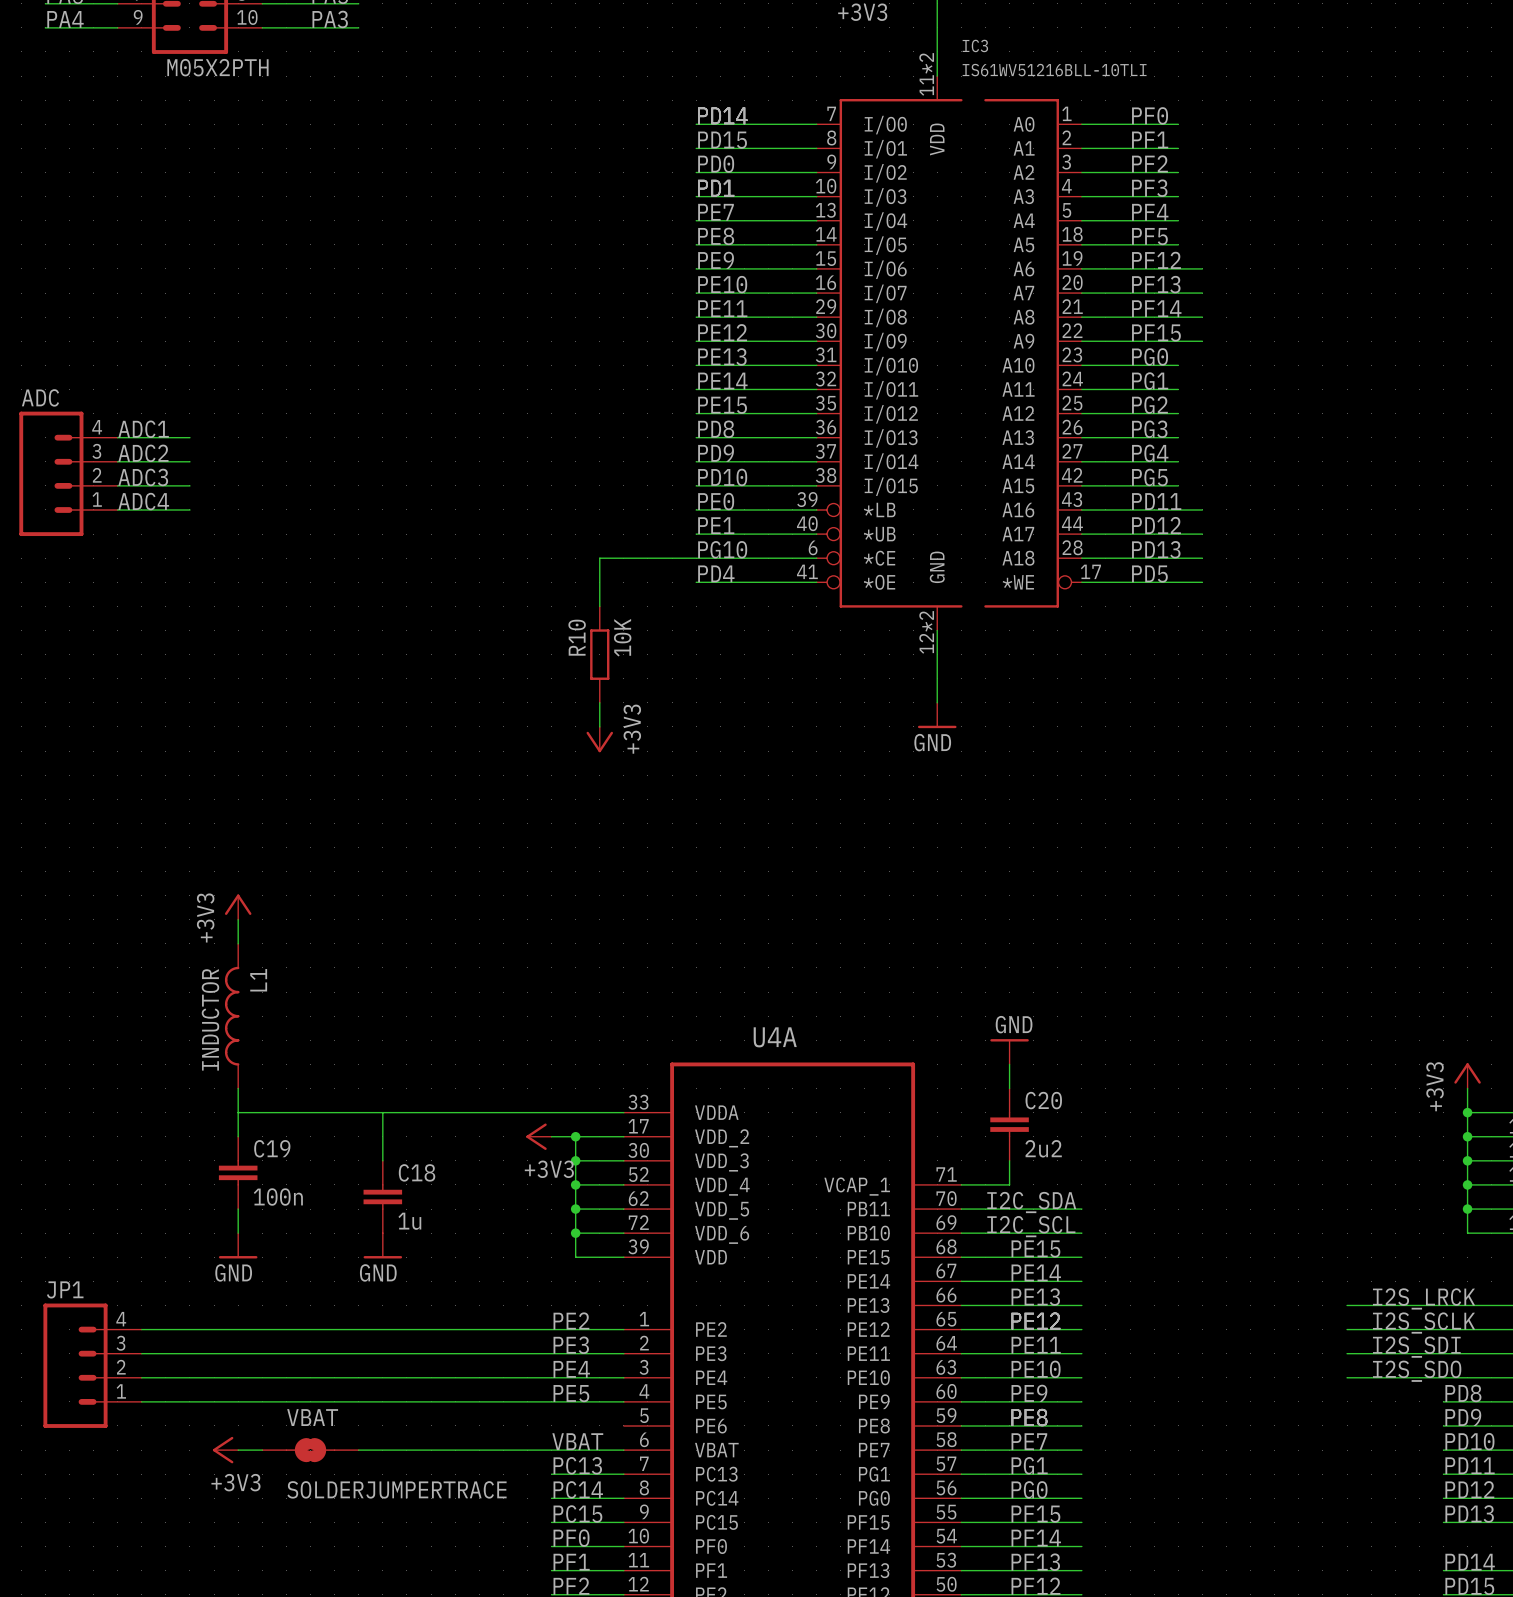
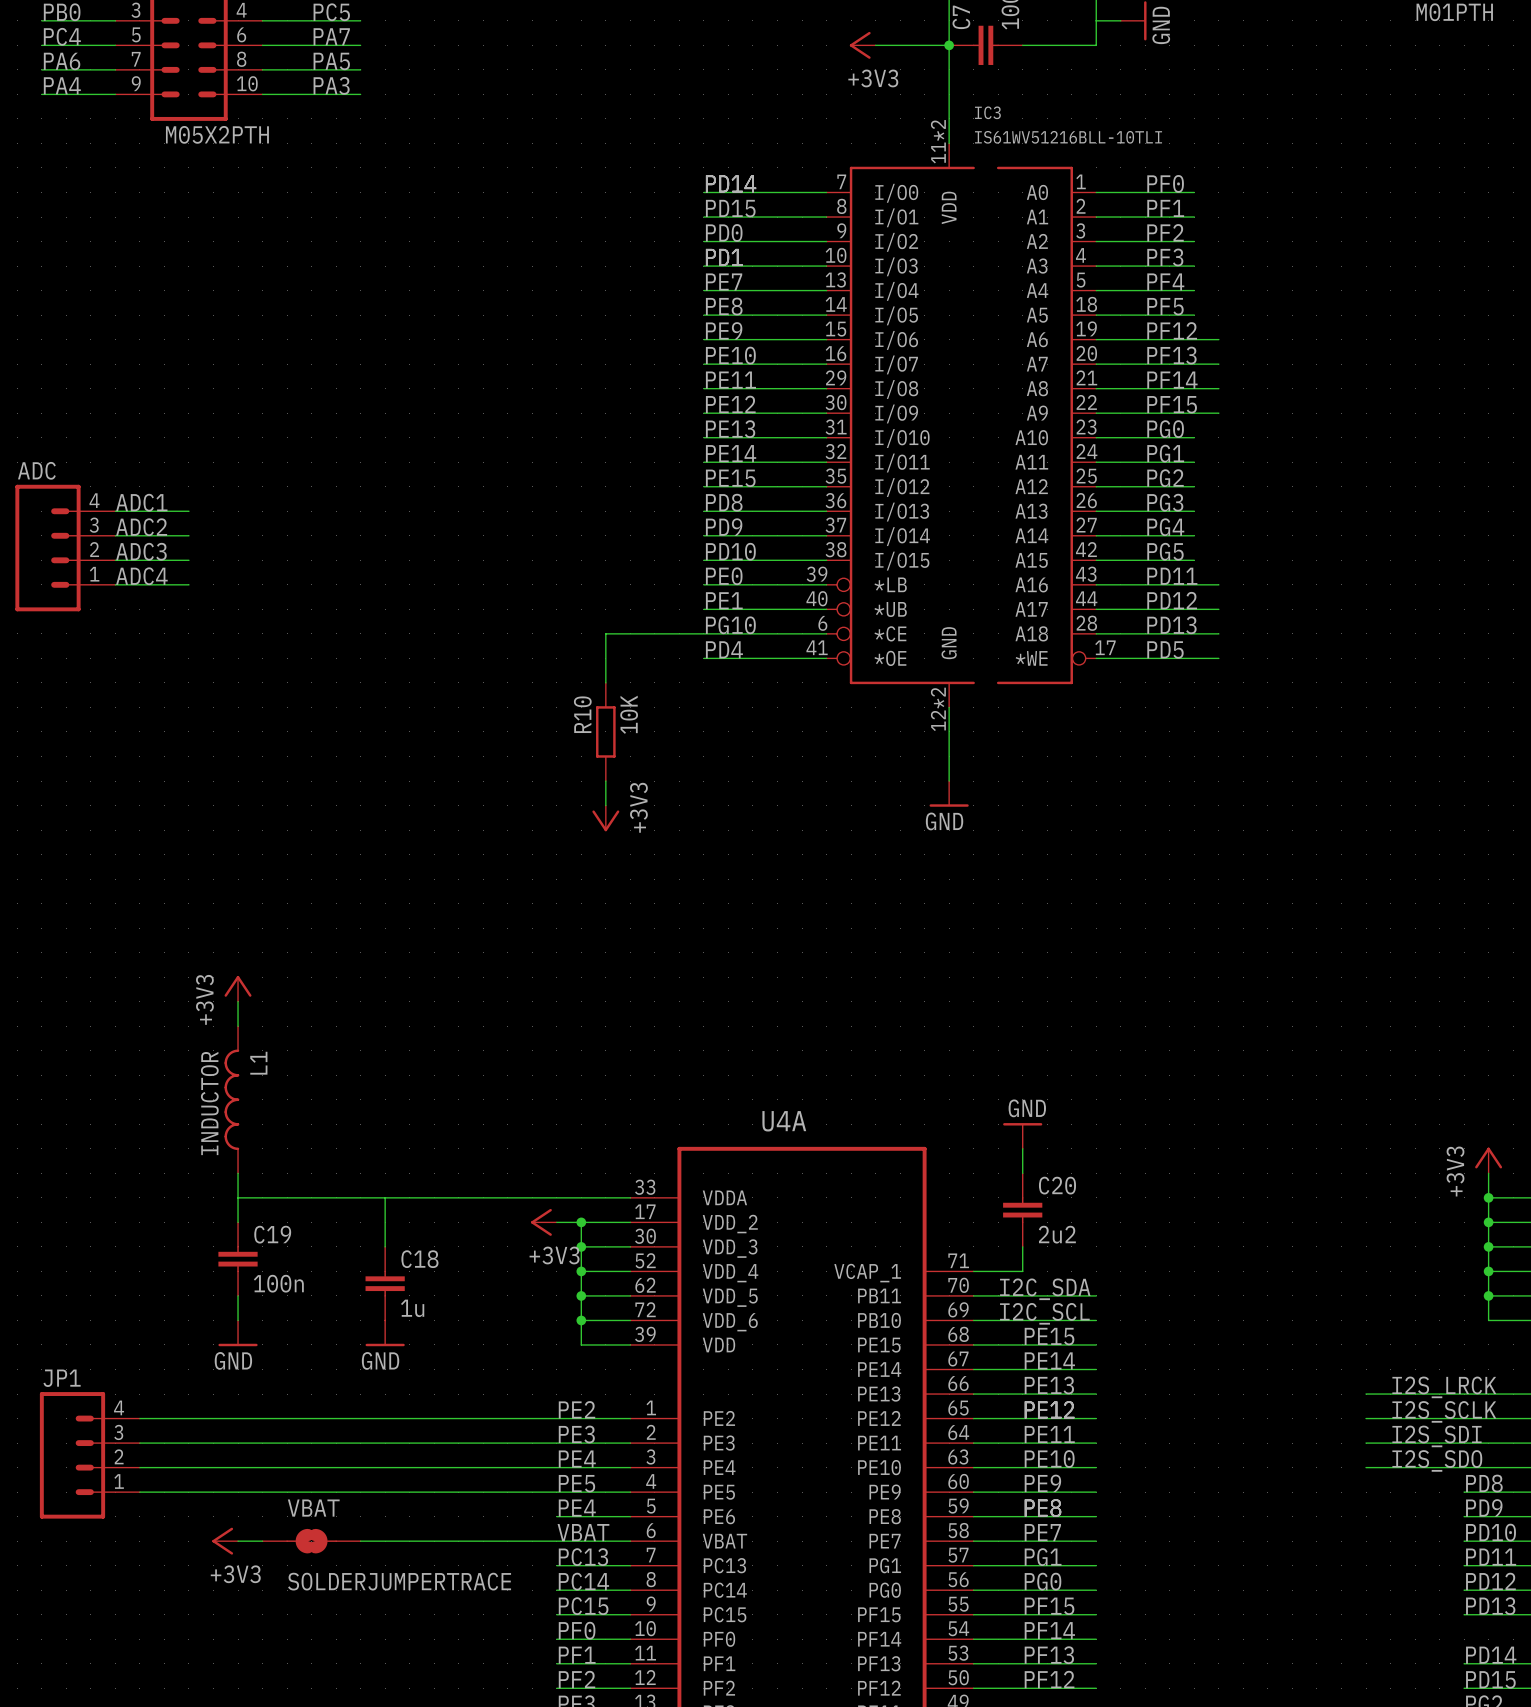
label: none -> PE4 (577, 1508)
wire: none -> (556, 1516) (630, 1516)

